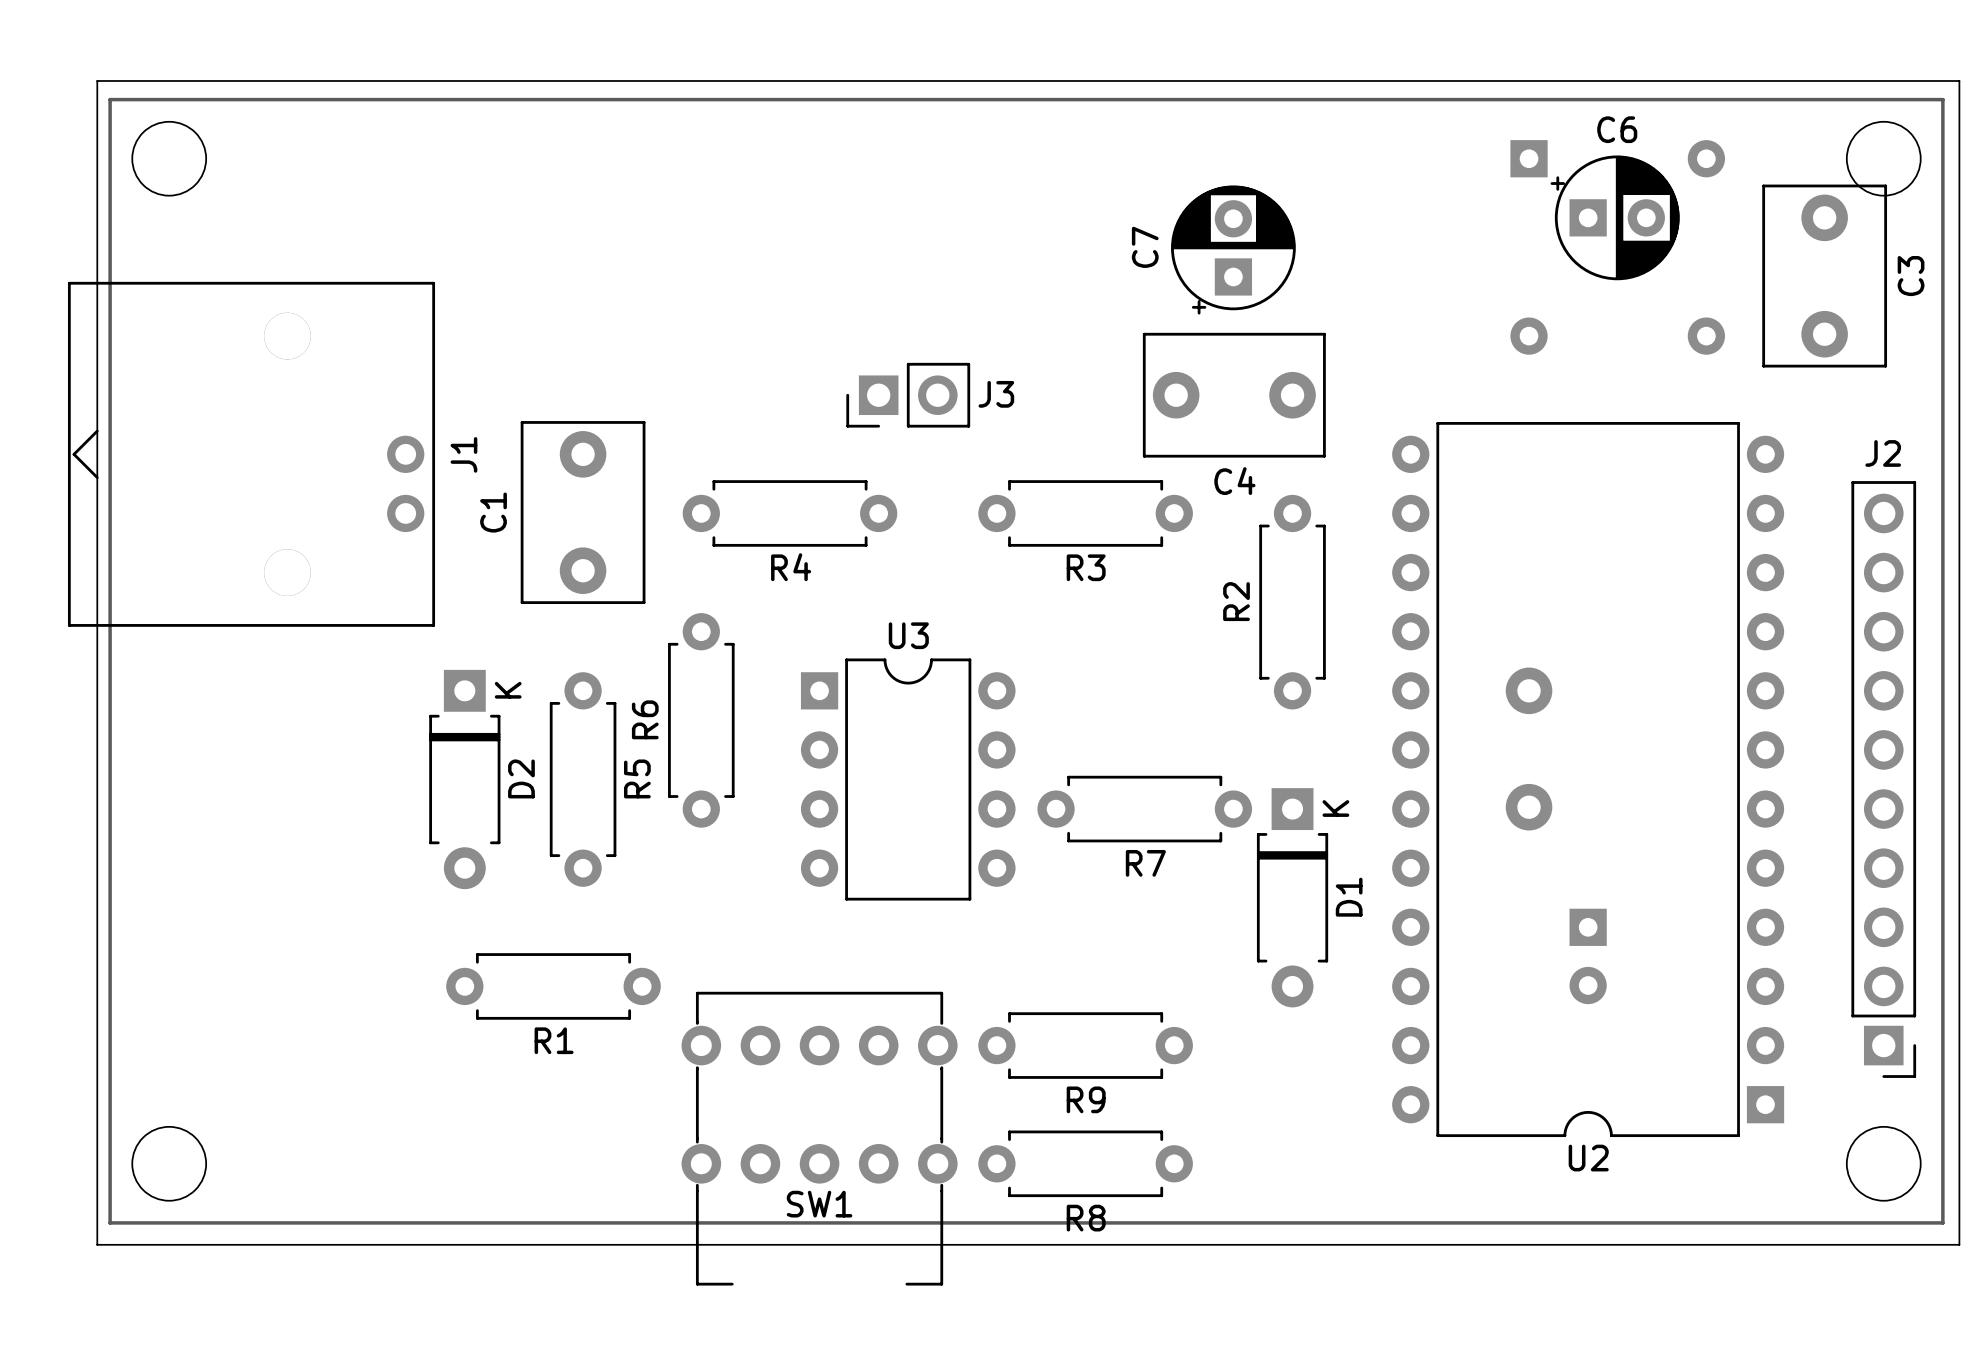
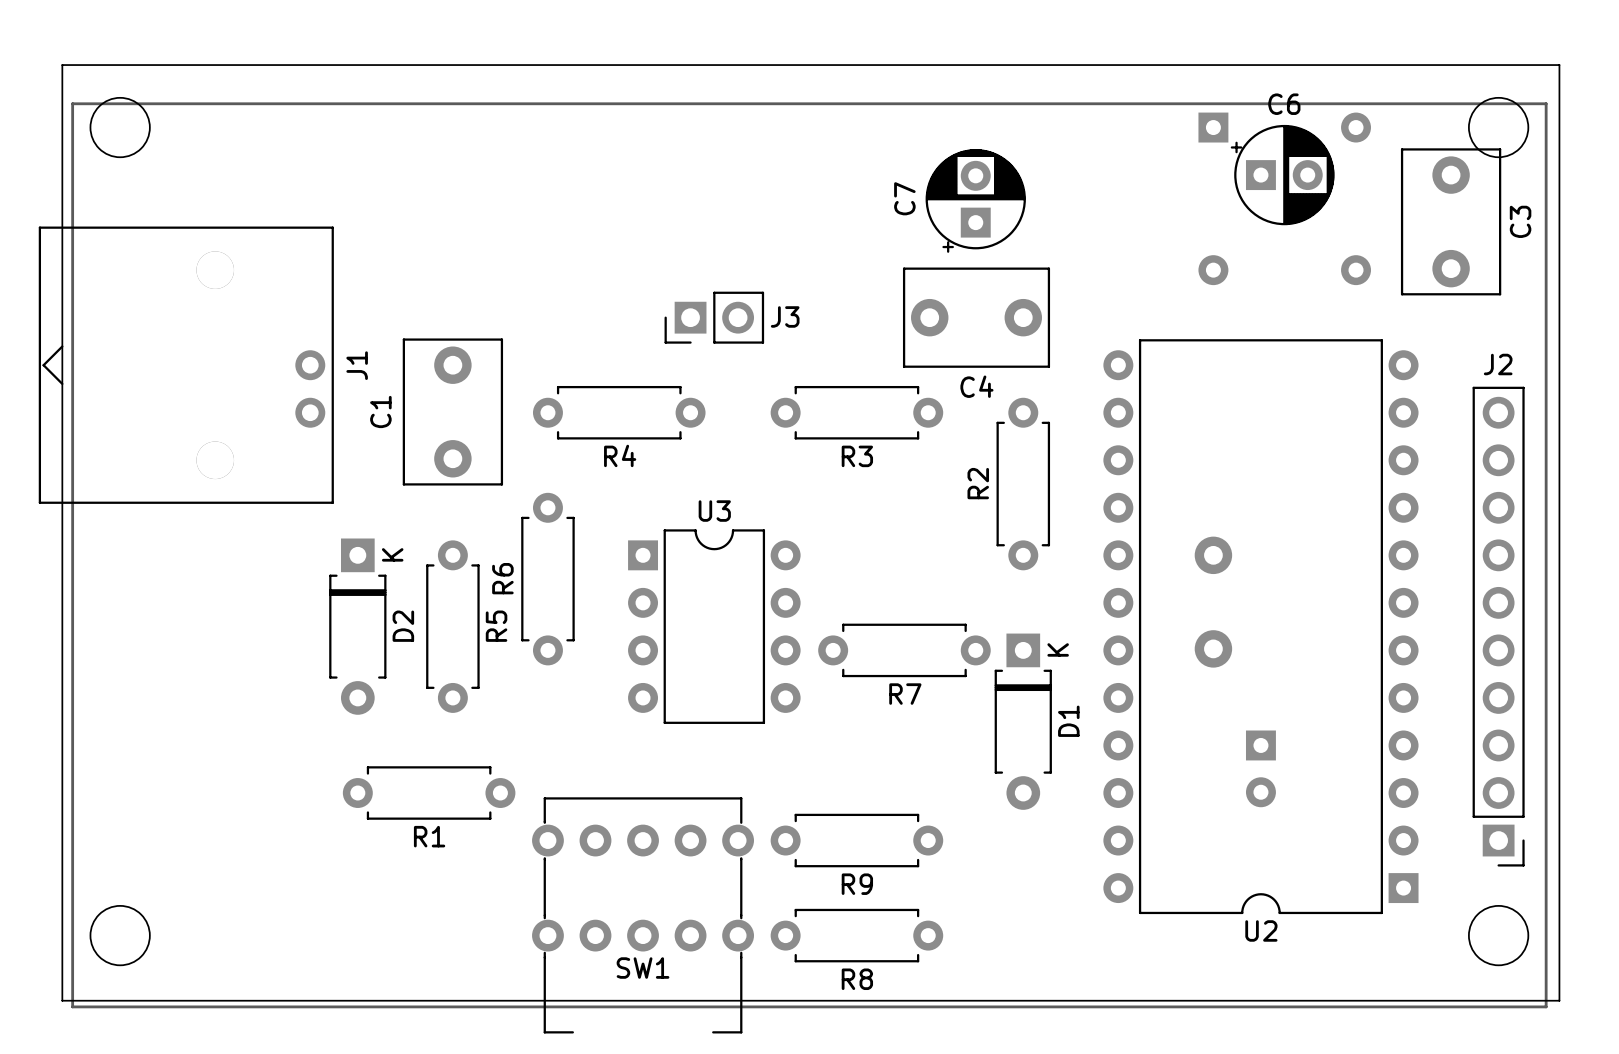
line: (110, 129) (110, 99) (1942, 99) (1942, 129) -> (72, 103) (1546, 103)
line: (110, 1222) (1942, 1222) -> (72, 983) (72, 1006) (1546, 1006) (1546, 983)

